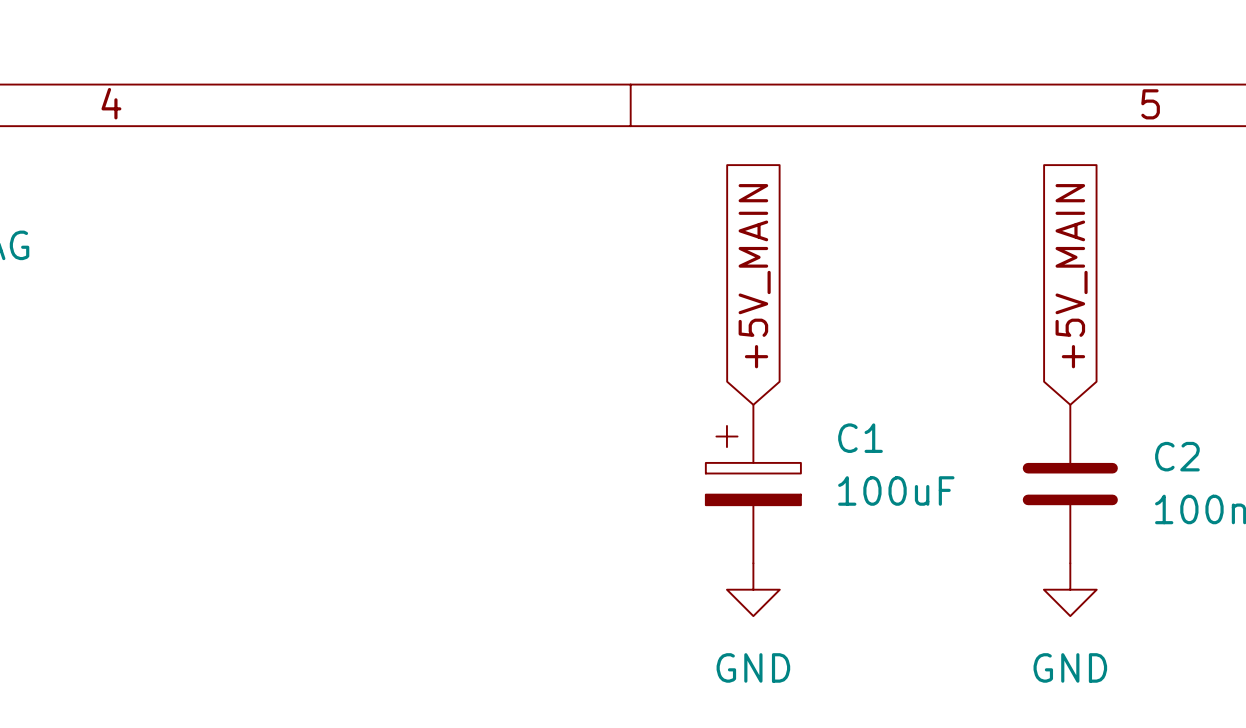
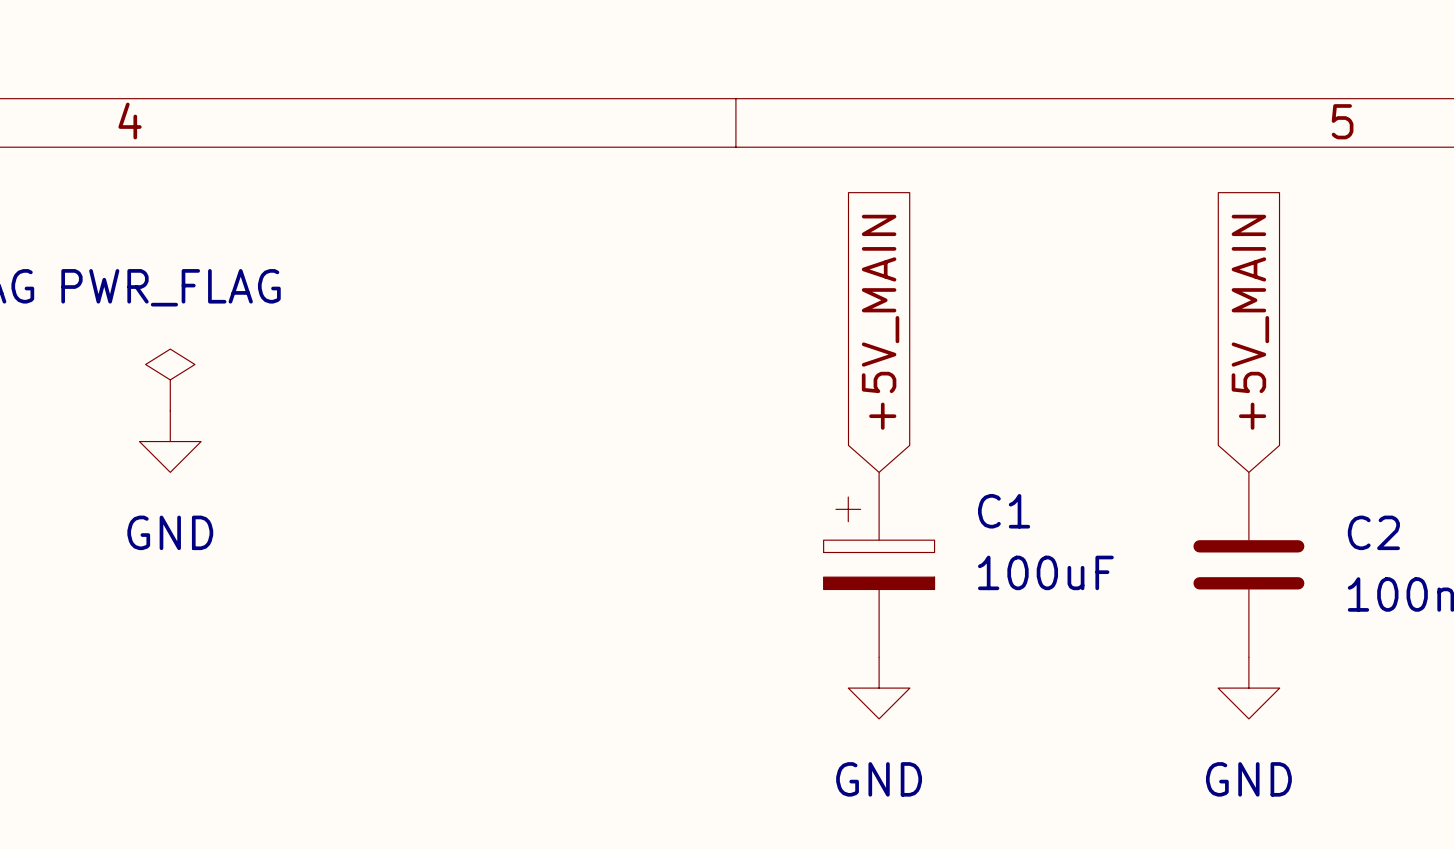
power symbol: none -> PWR_FLAG (170, 379)
power symbol: none -> GND (170, 441)

